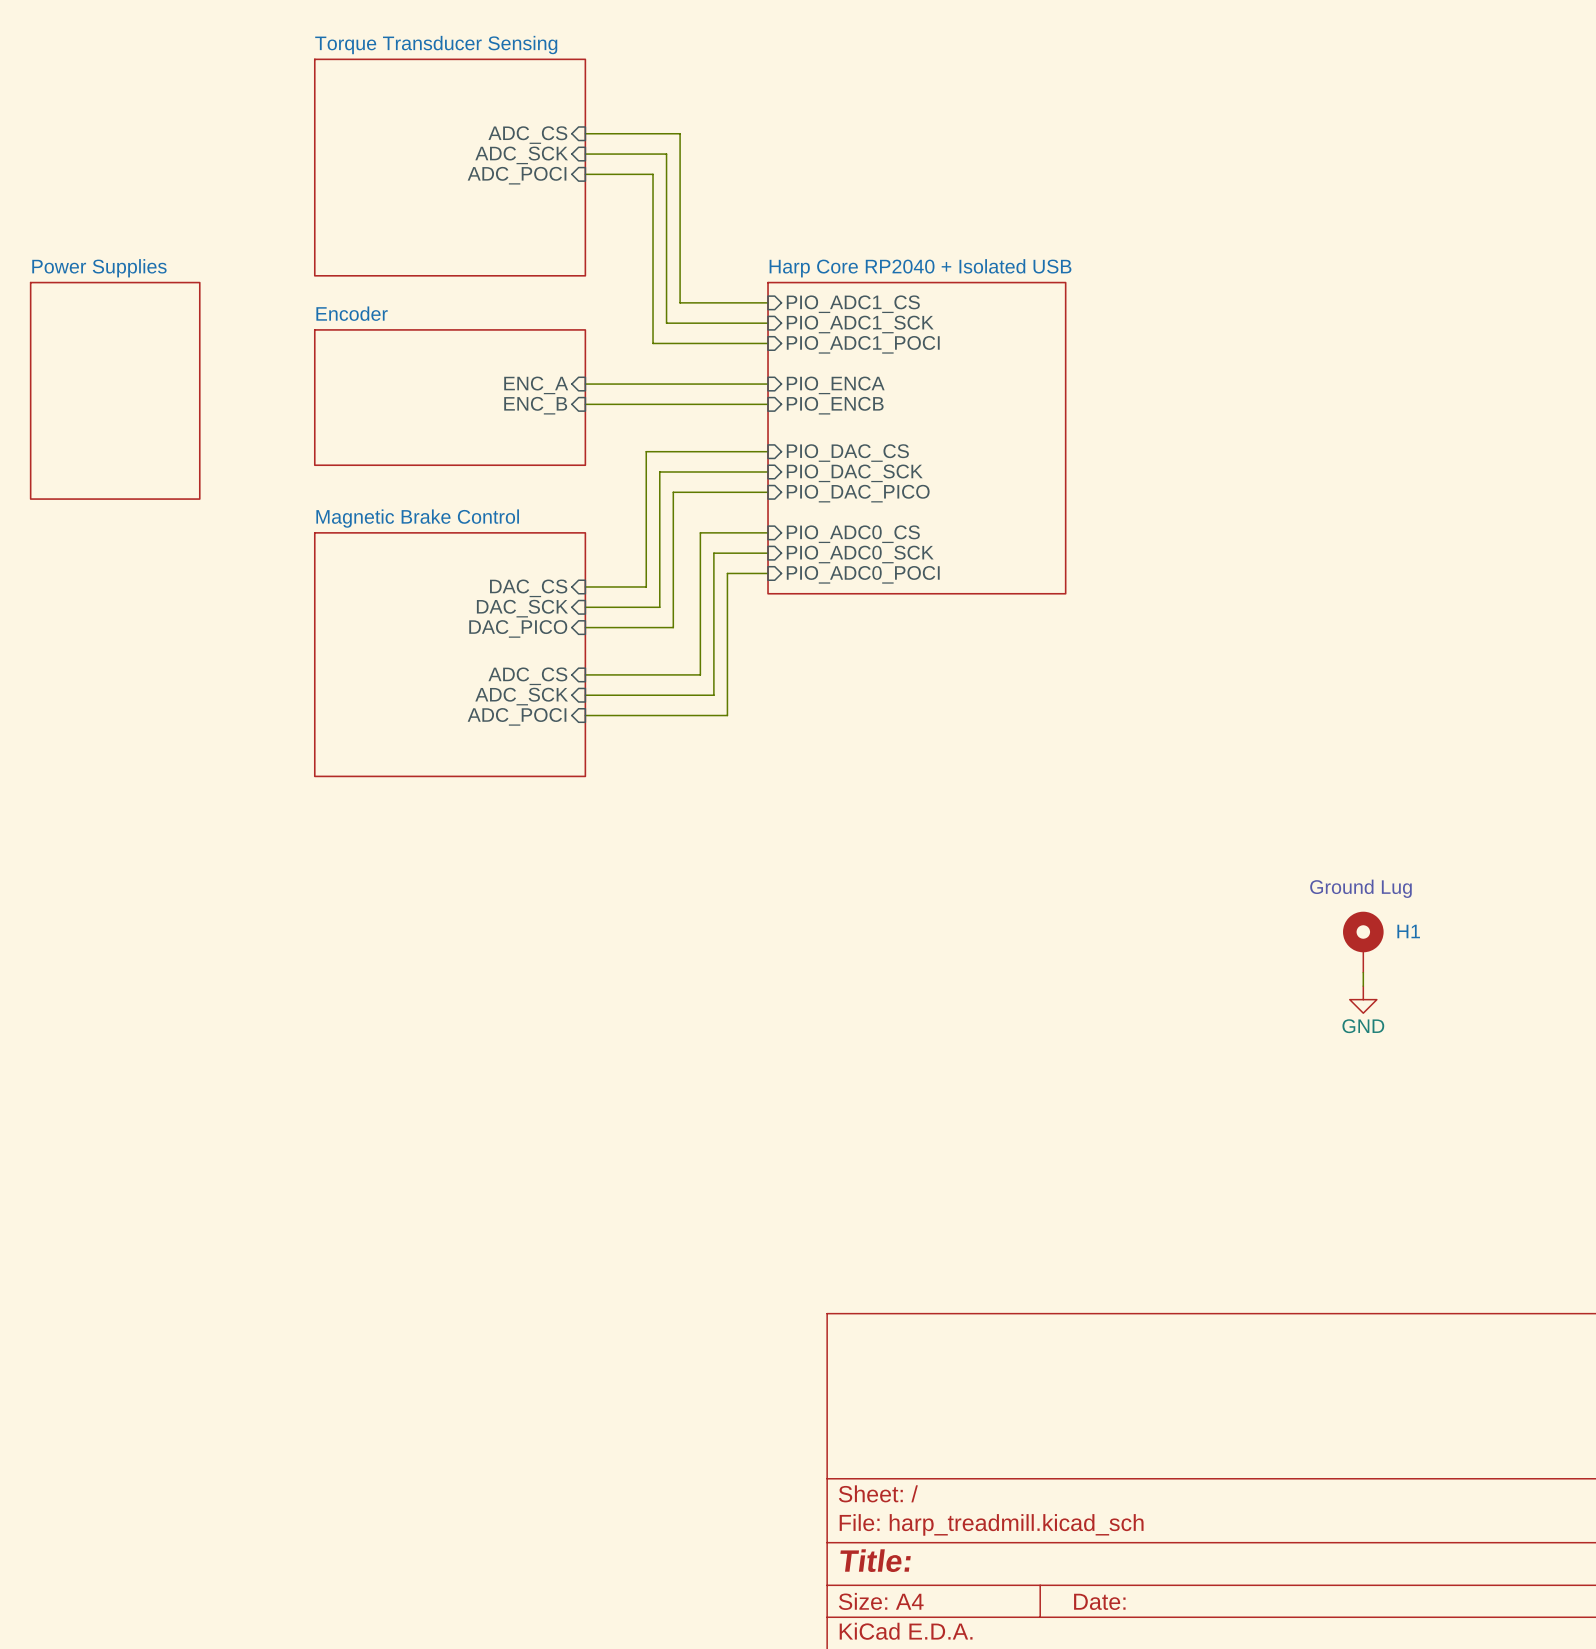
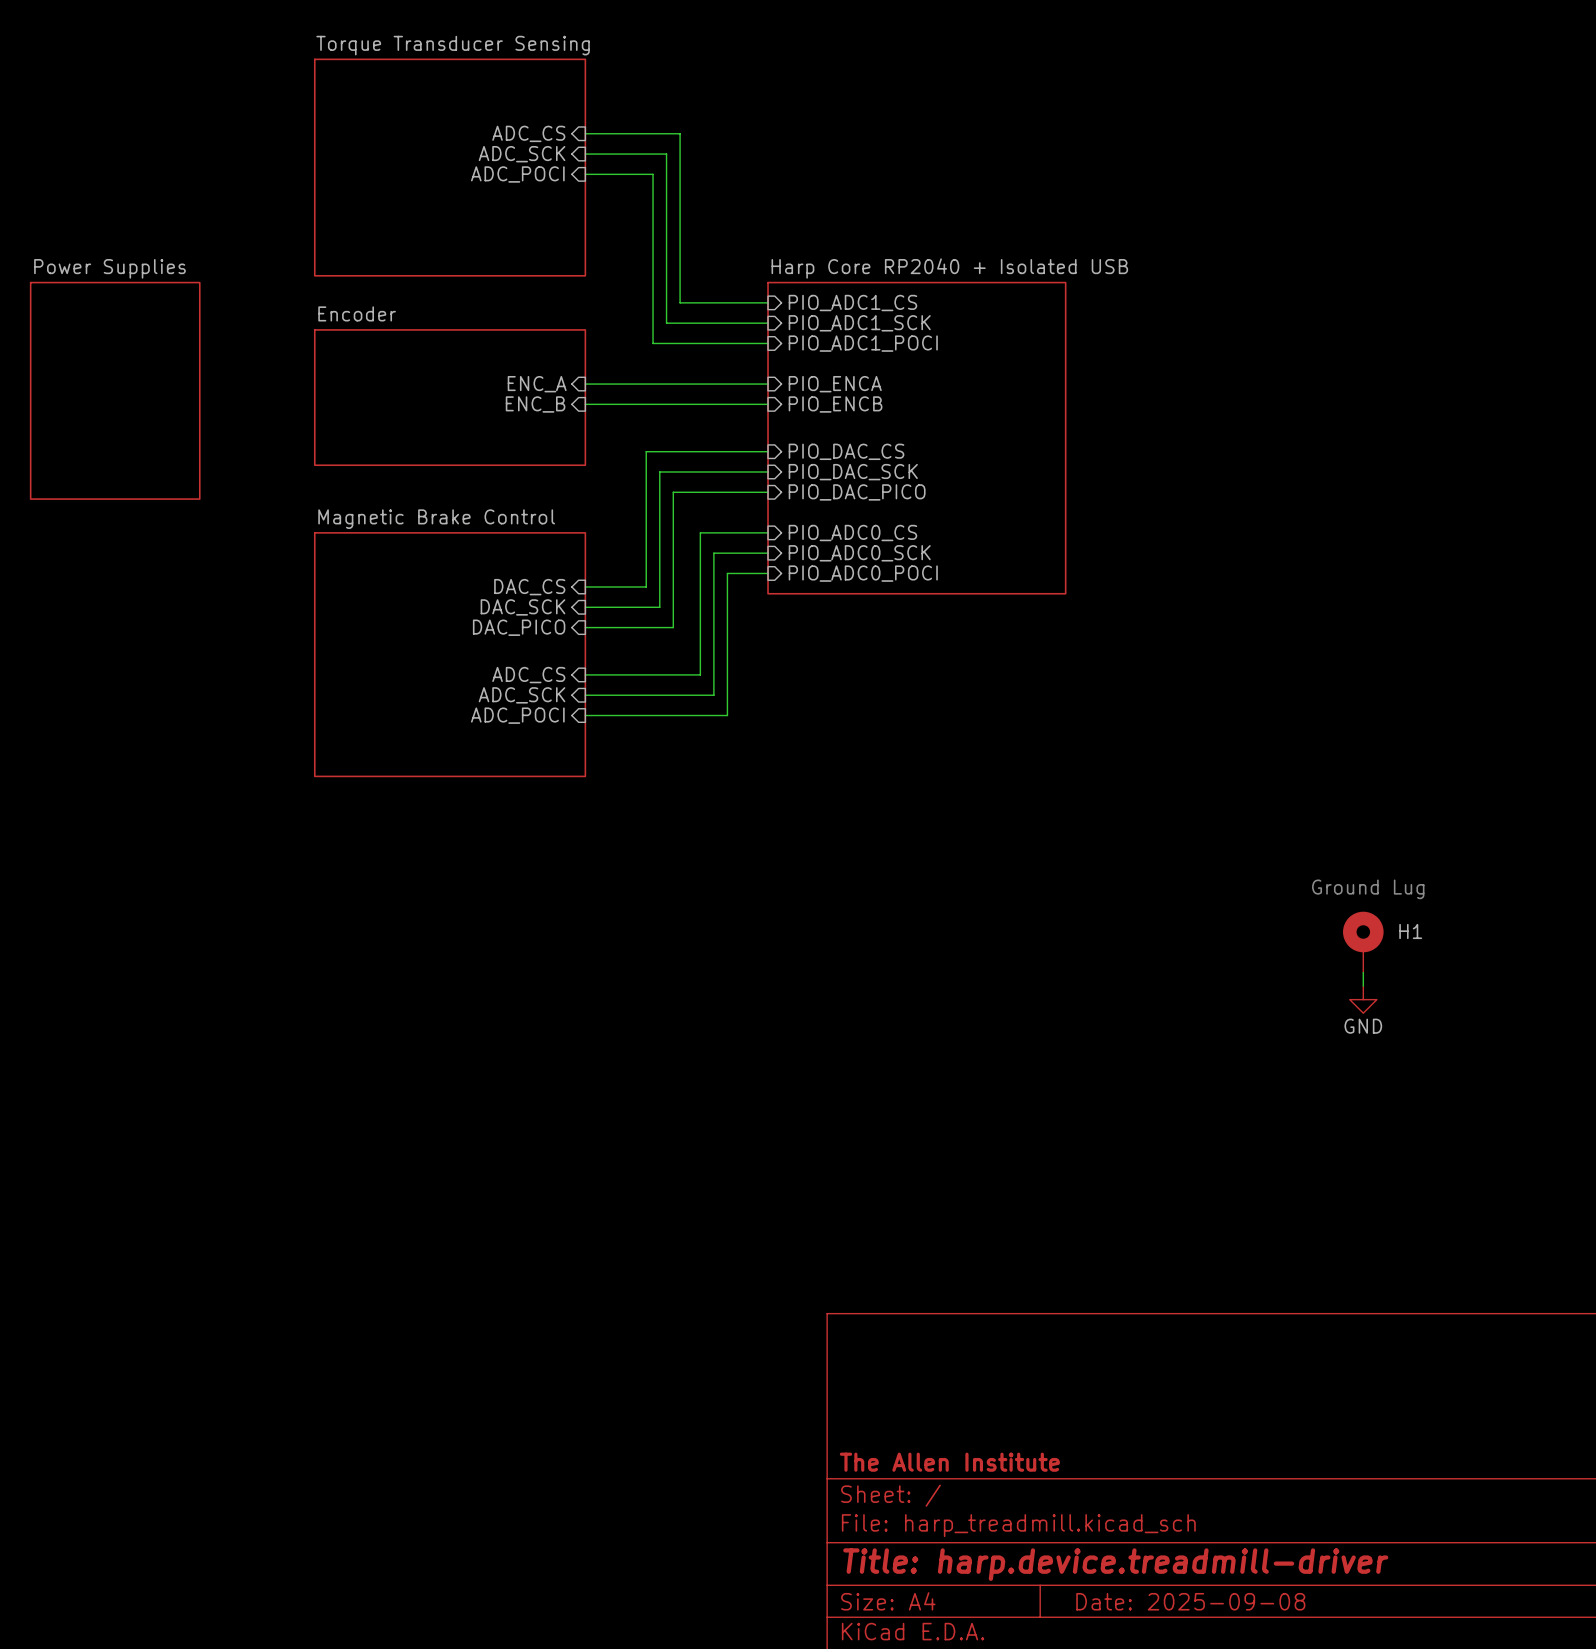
title block: none -> The Allen Institute (949, 1462)
title block: Title: (875, 1560) -> Title: harp.device.treadmill-driver (1115, 1564)
title block: Date: (1099, 1601) -> Date: 2025-09-08 (1190, 1601)

